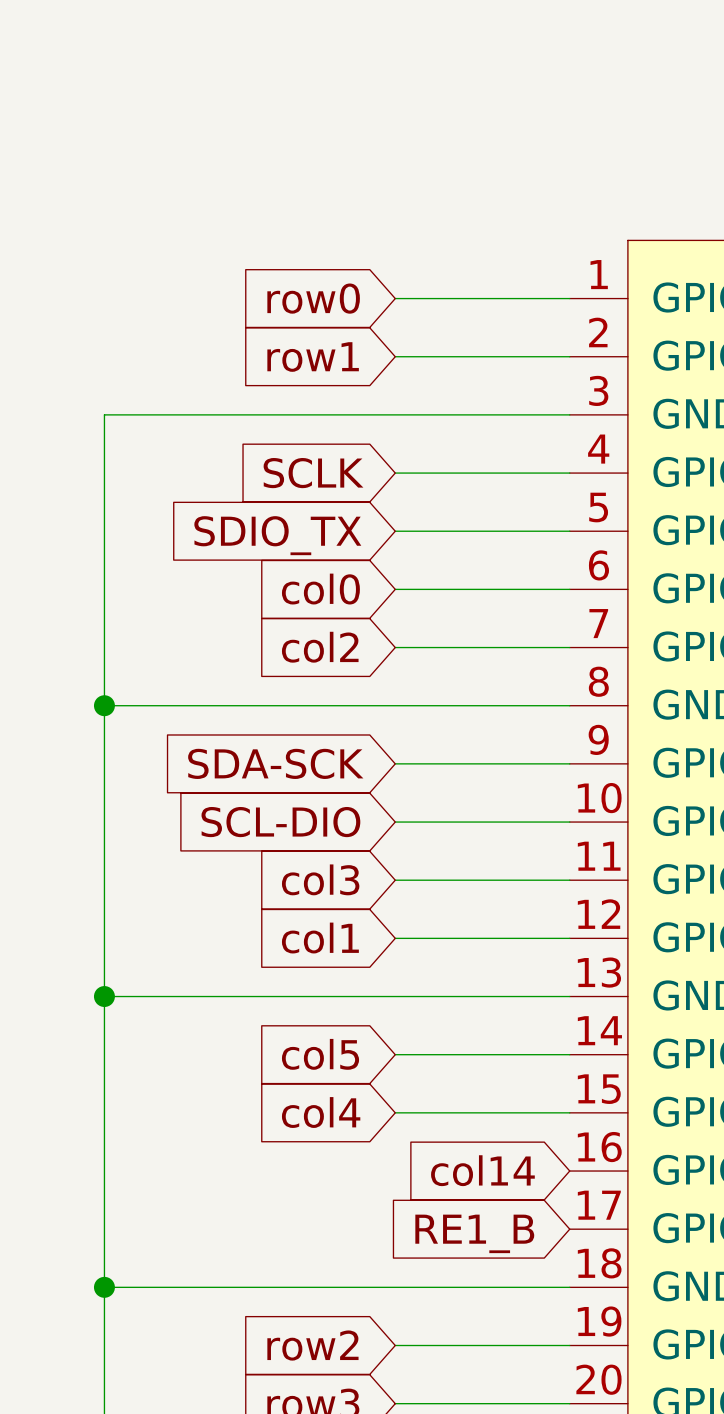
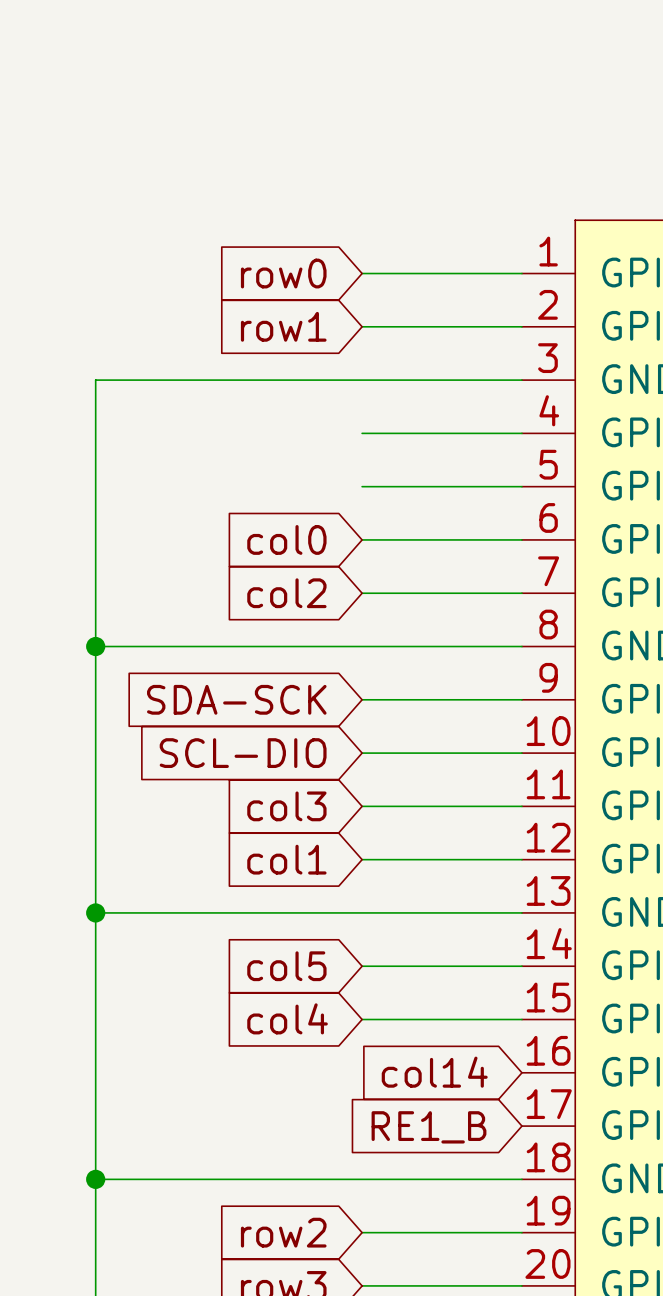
global label: SCLK (313, 473) -> none
global label: SDIO_TX (277, 535) -> none

